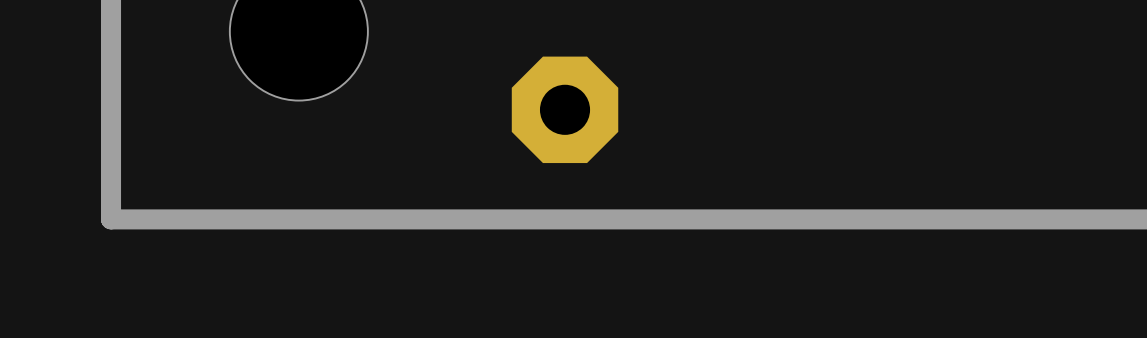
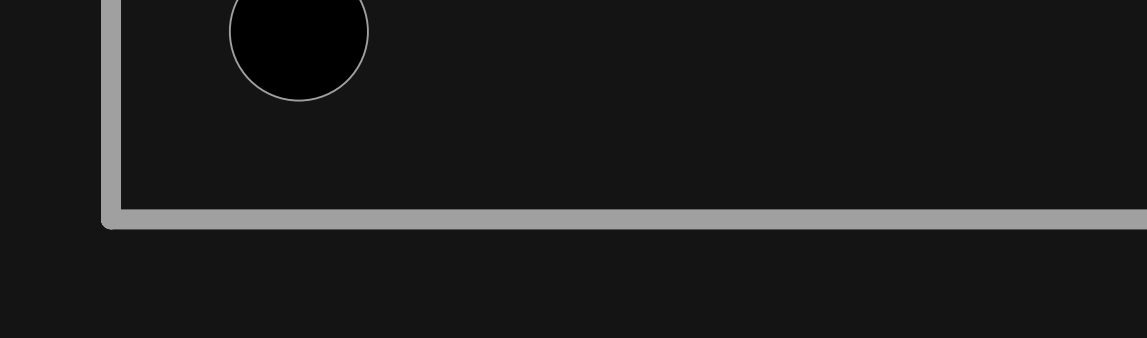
part: (565, 109) -> none

